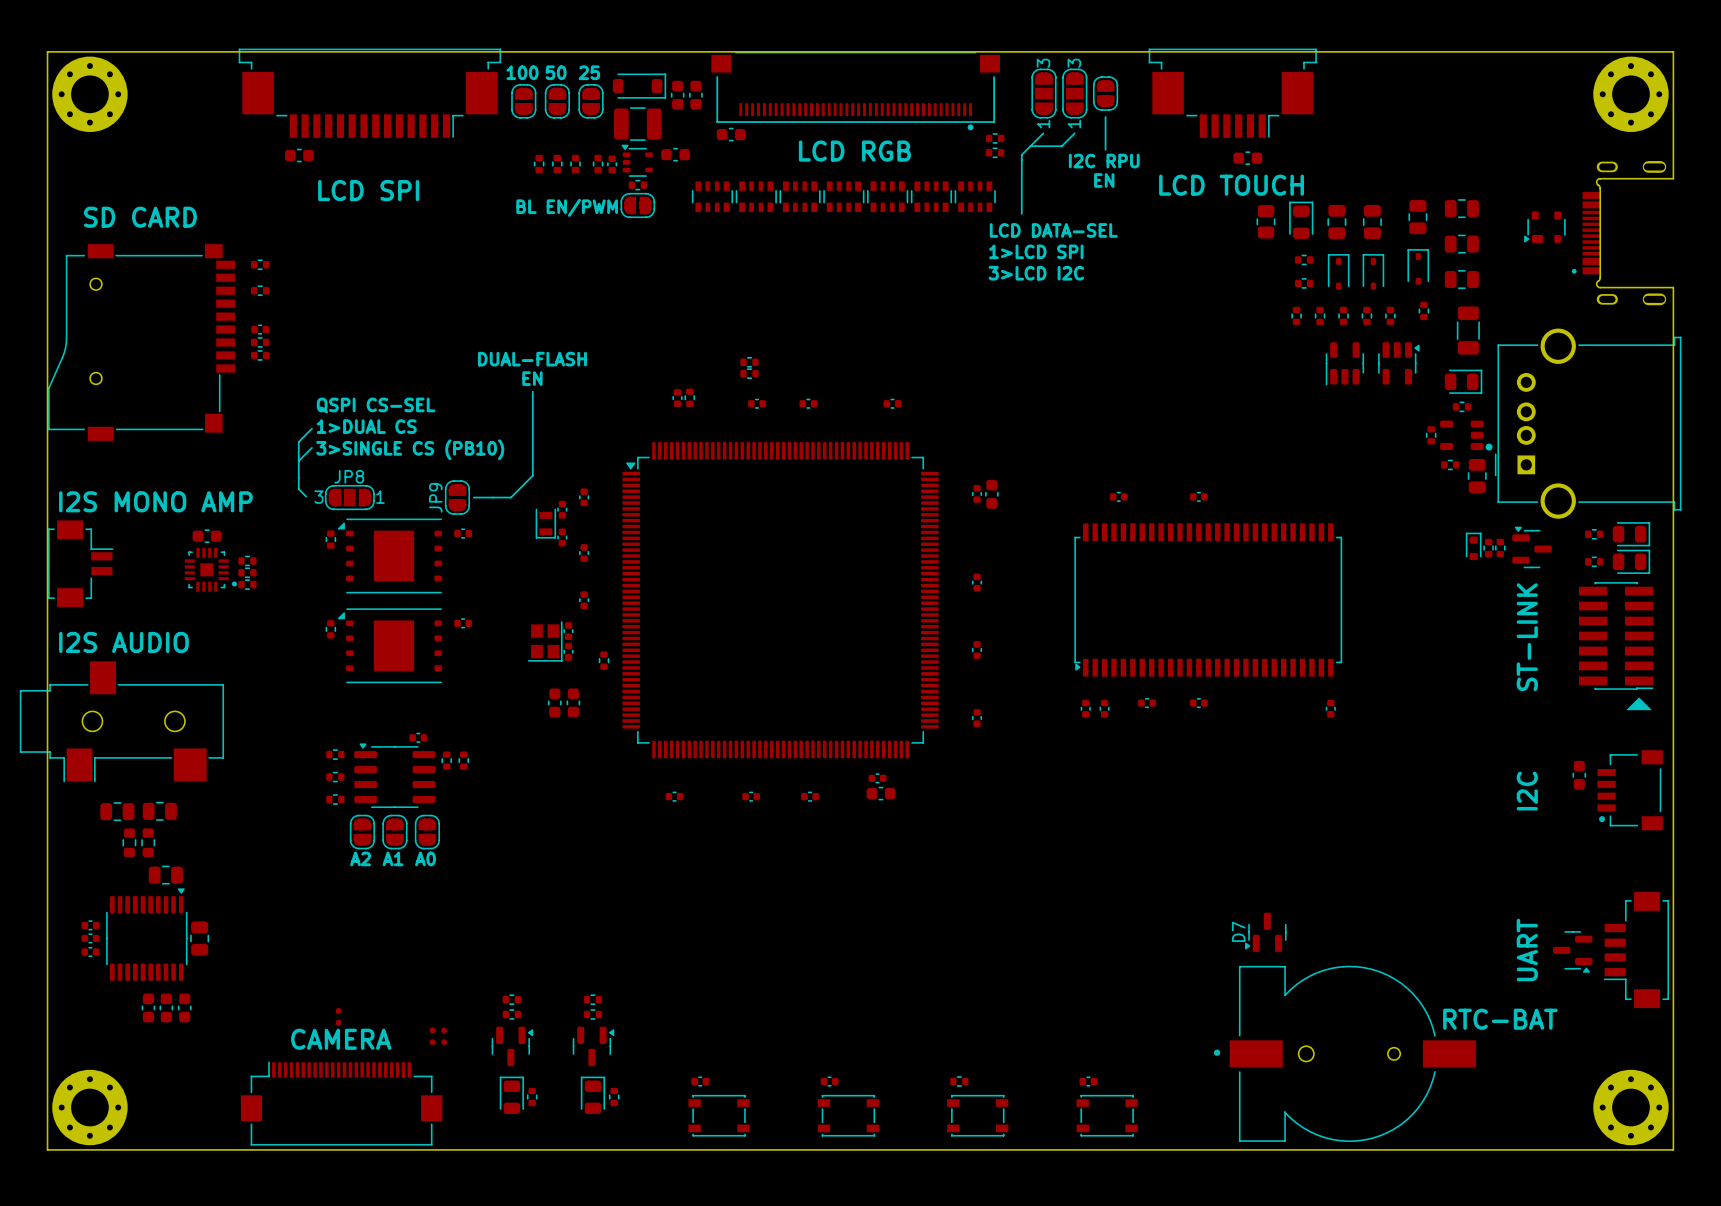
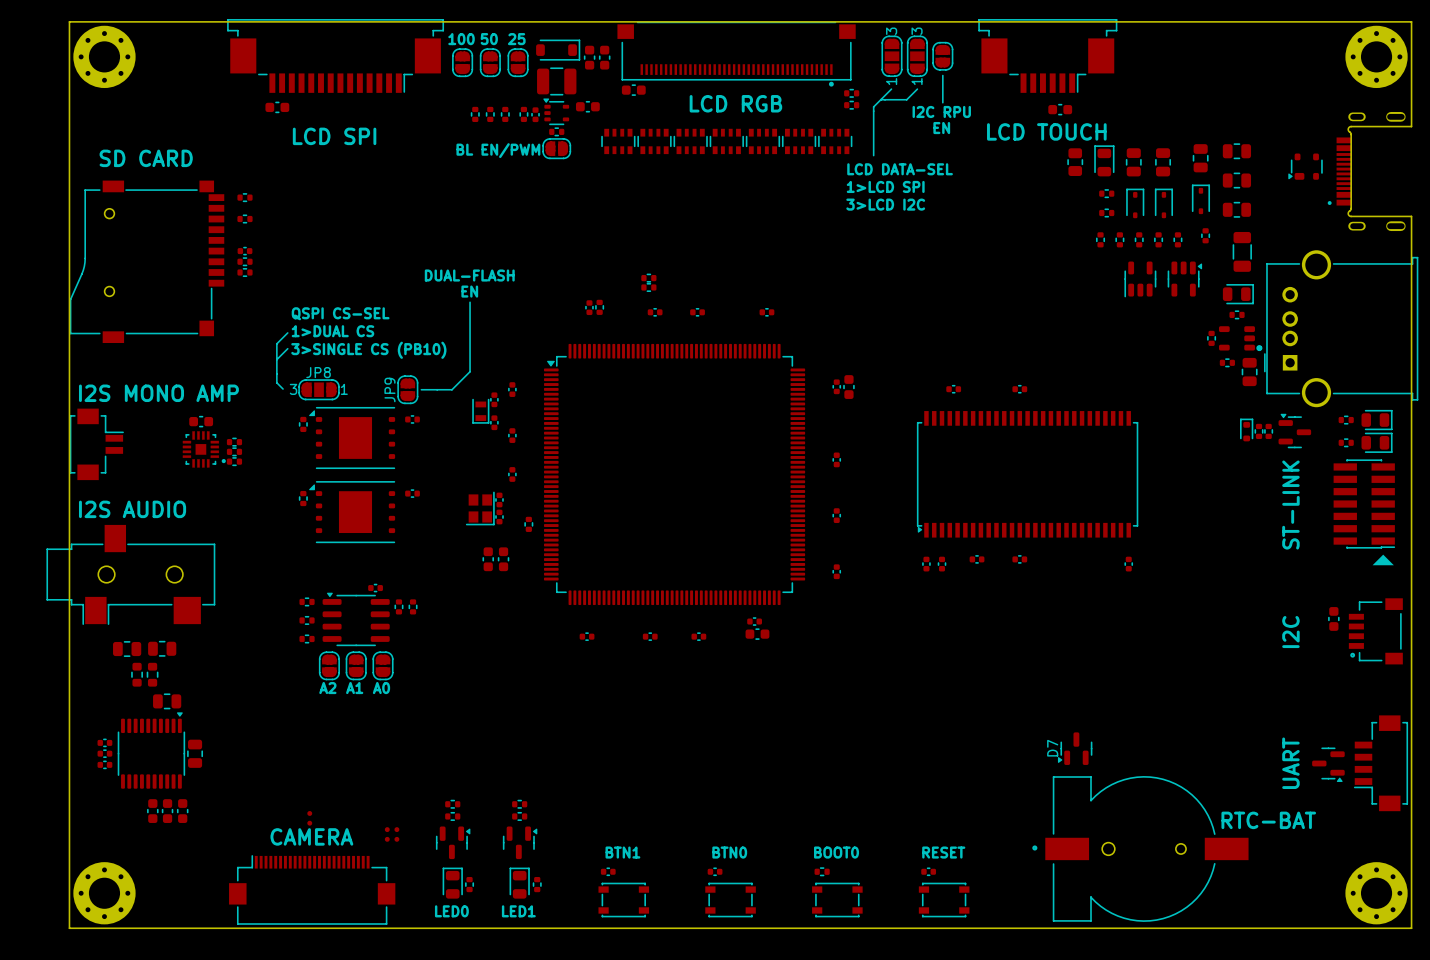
text: none -> BTN1 (622, 852)
text: none -> BTN0 (729, 852)
text: none -> BOOT0 (836, 852)
text: none -> RESET (943, 852)
text: none -> LED0 (451, 911)
text: none -> LED1 (518, 911)

